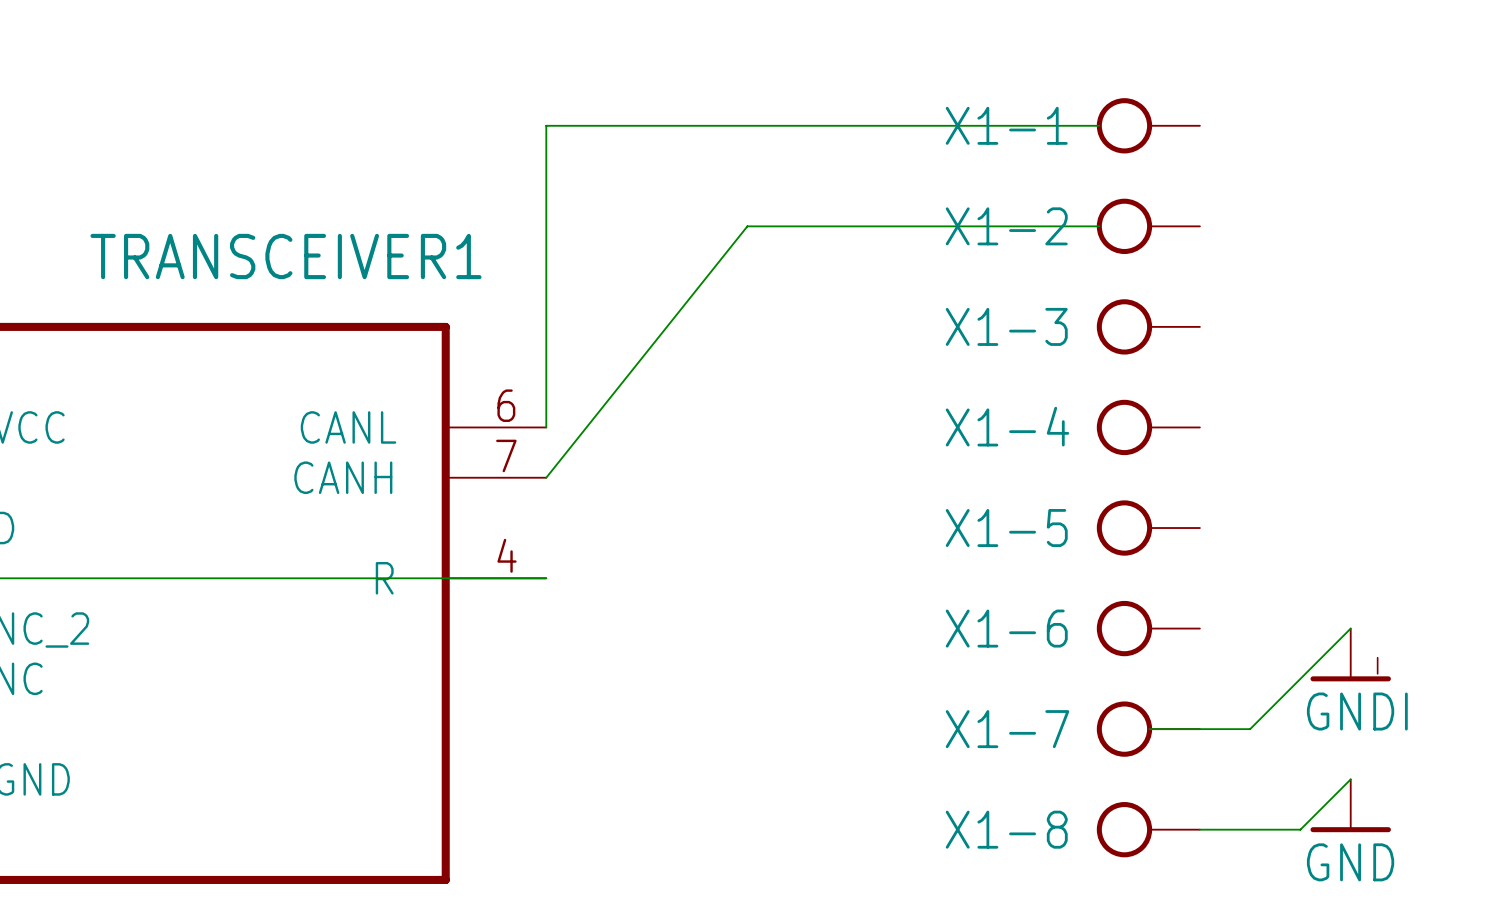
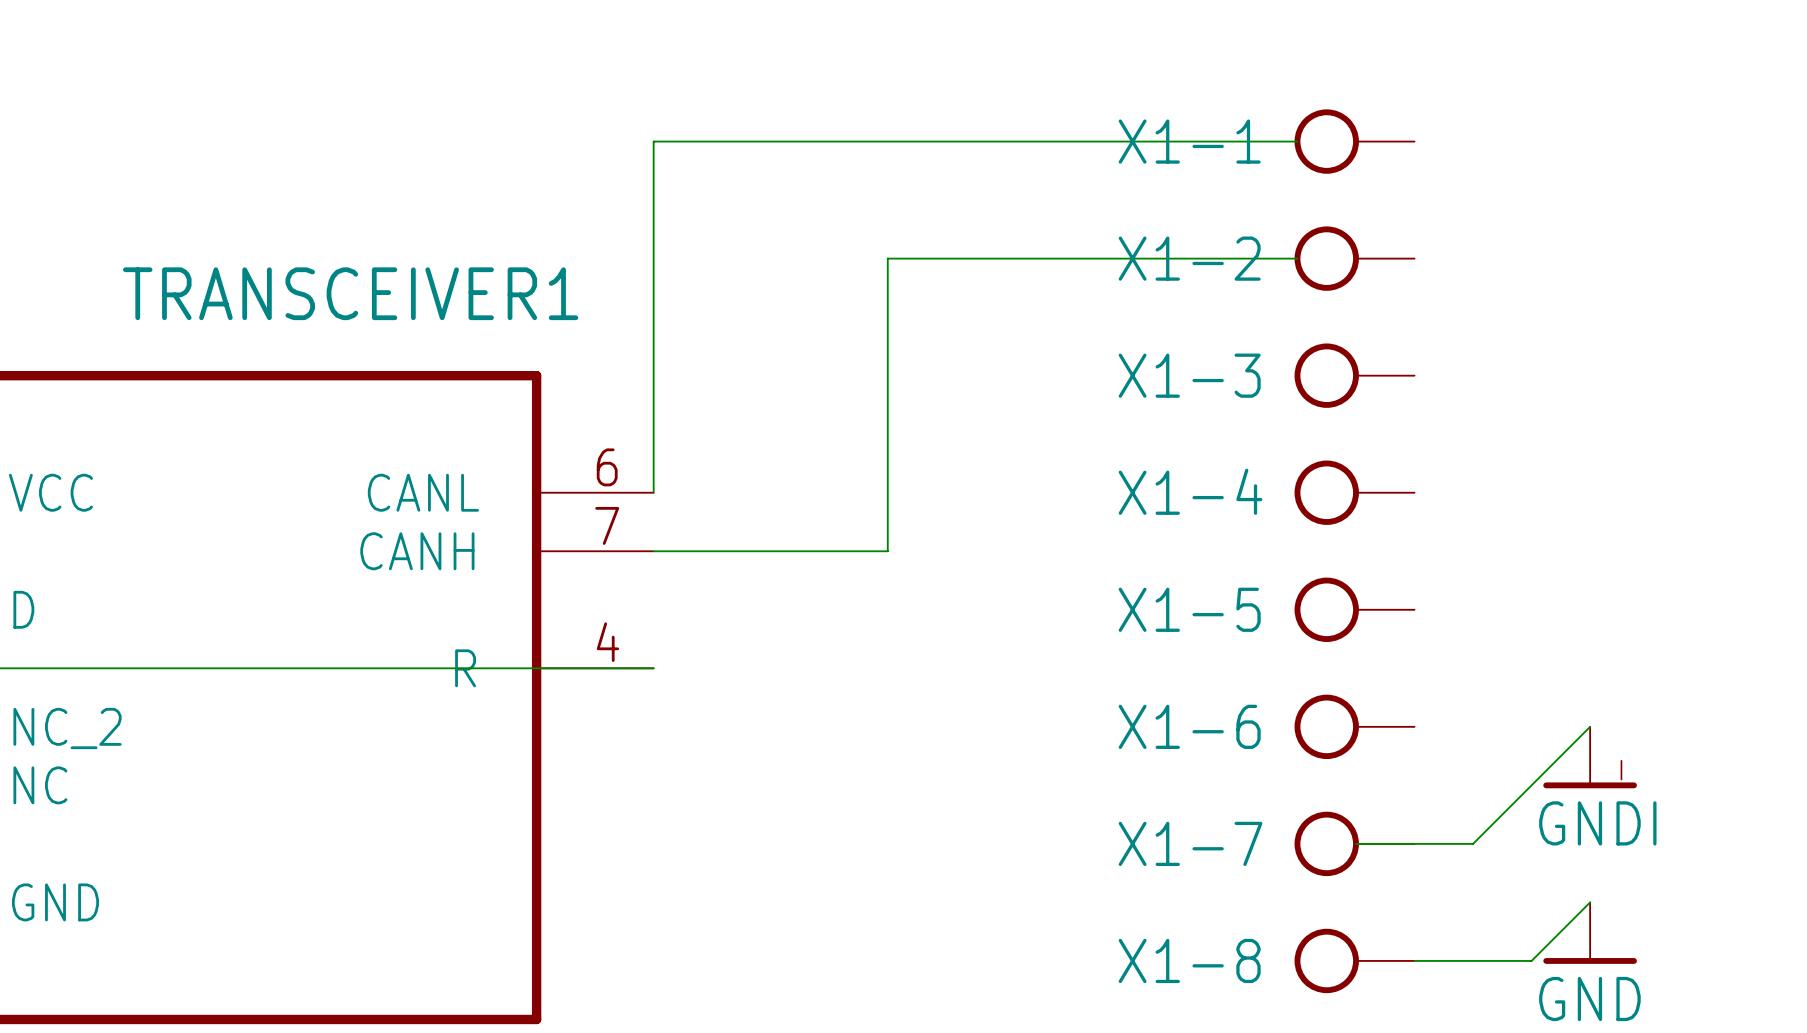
wire: (747, 226) (546, 477) -> (887, 258) (887, 551) (653, 551)

